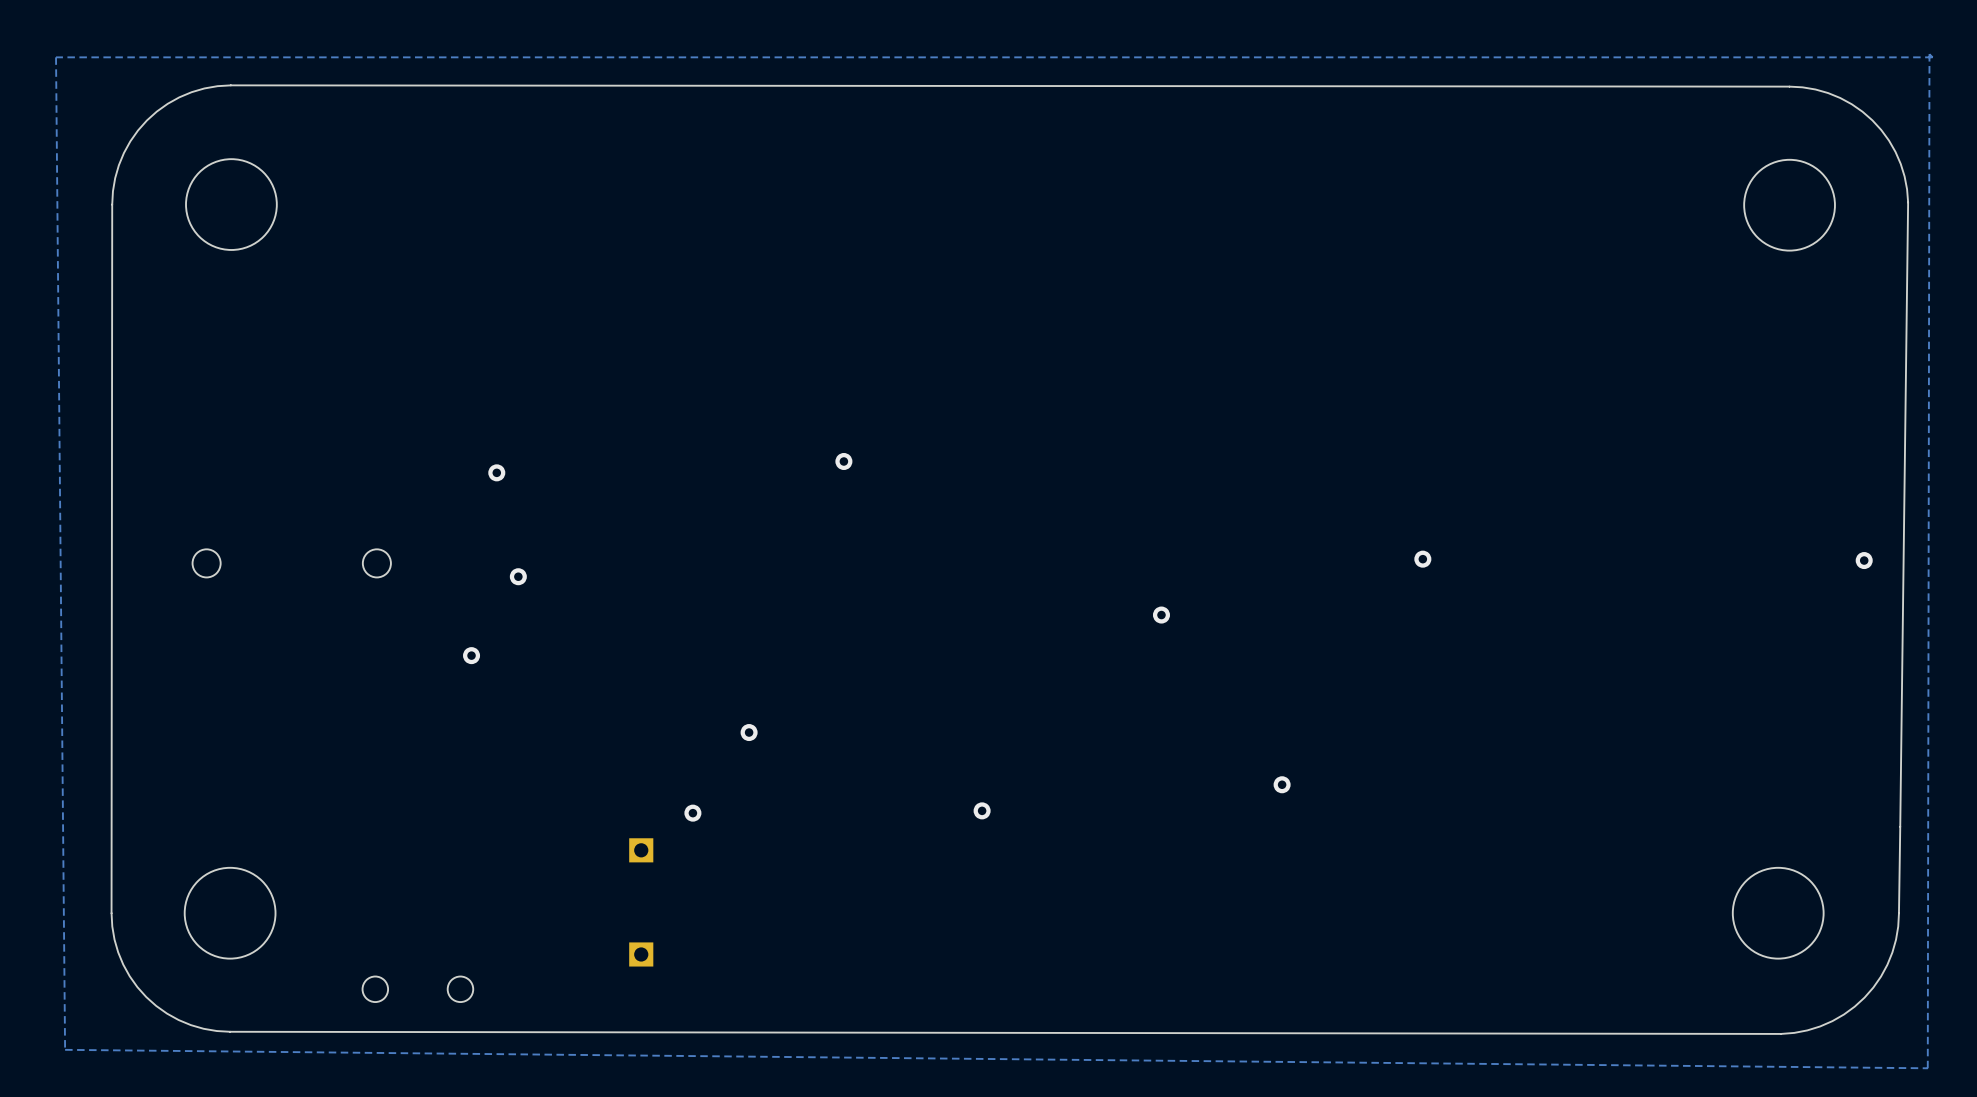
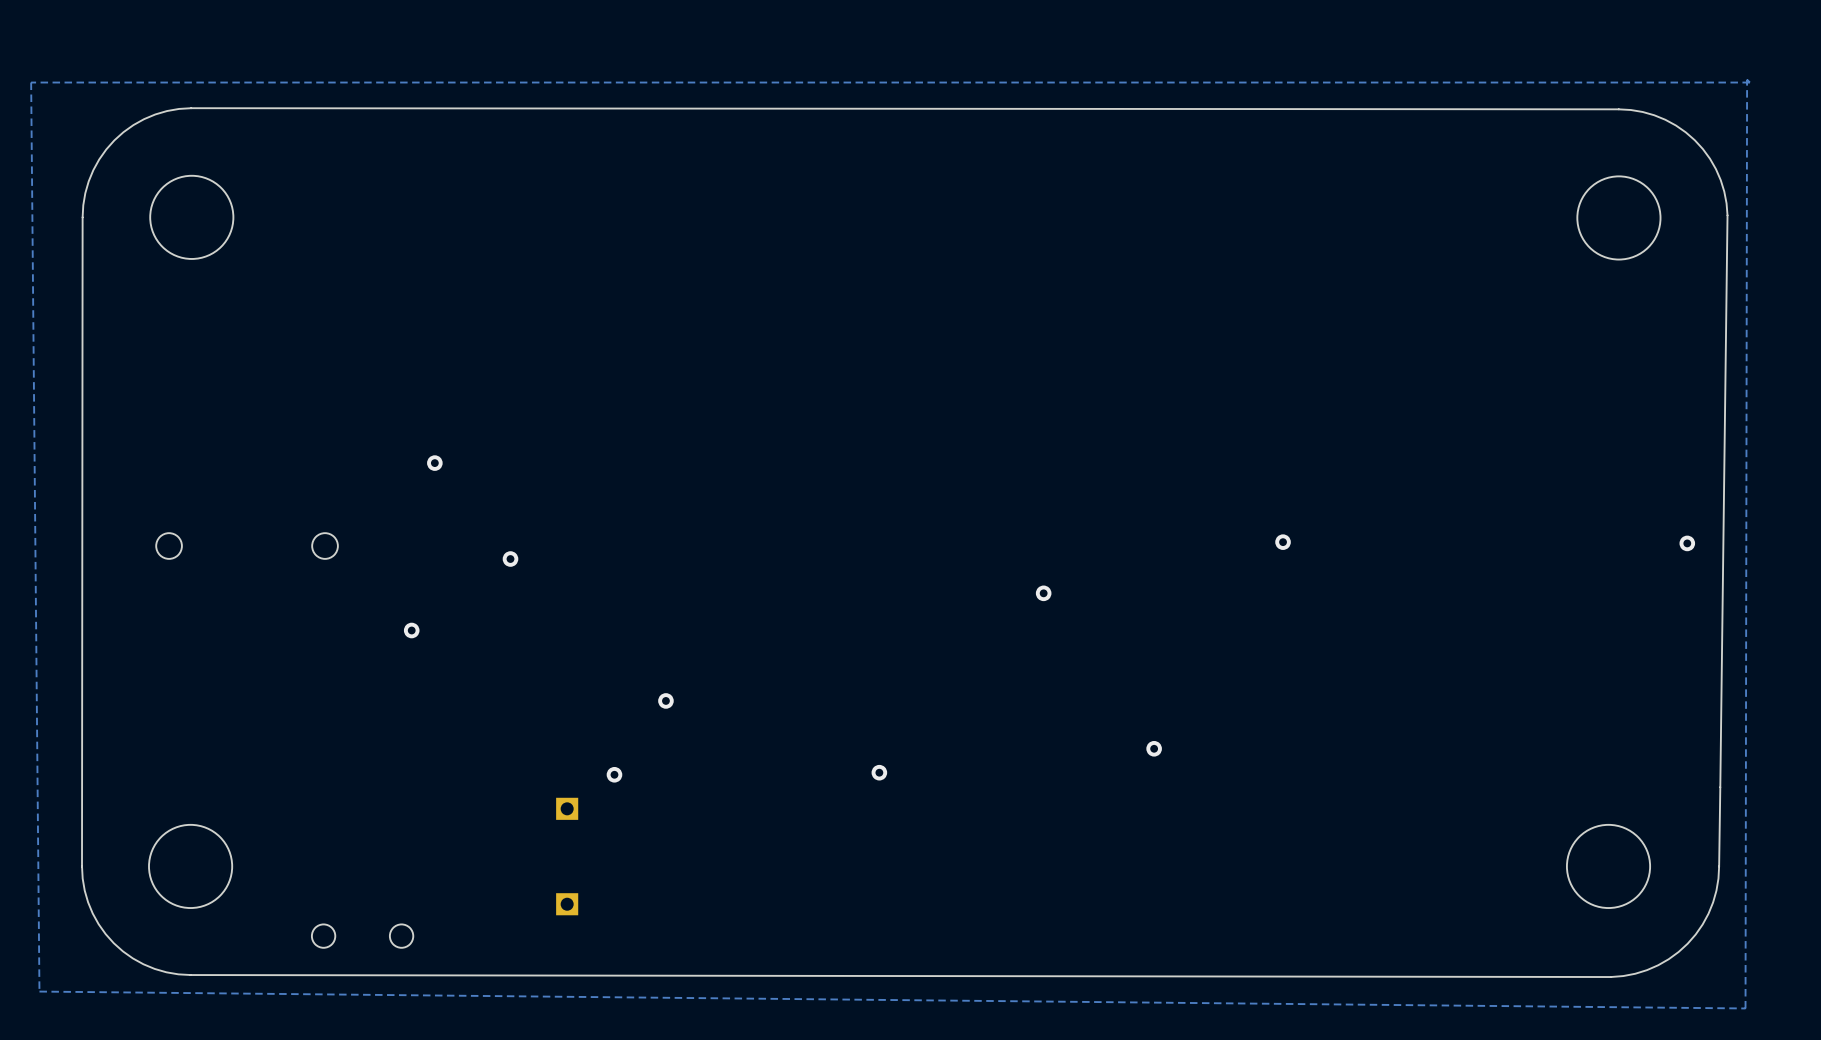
via: (843, 461) -> none
via position: (518, 576) -> (510, 559)

